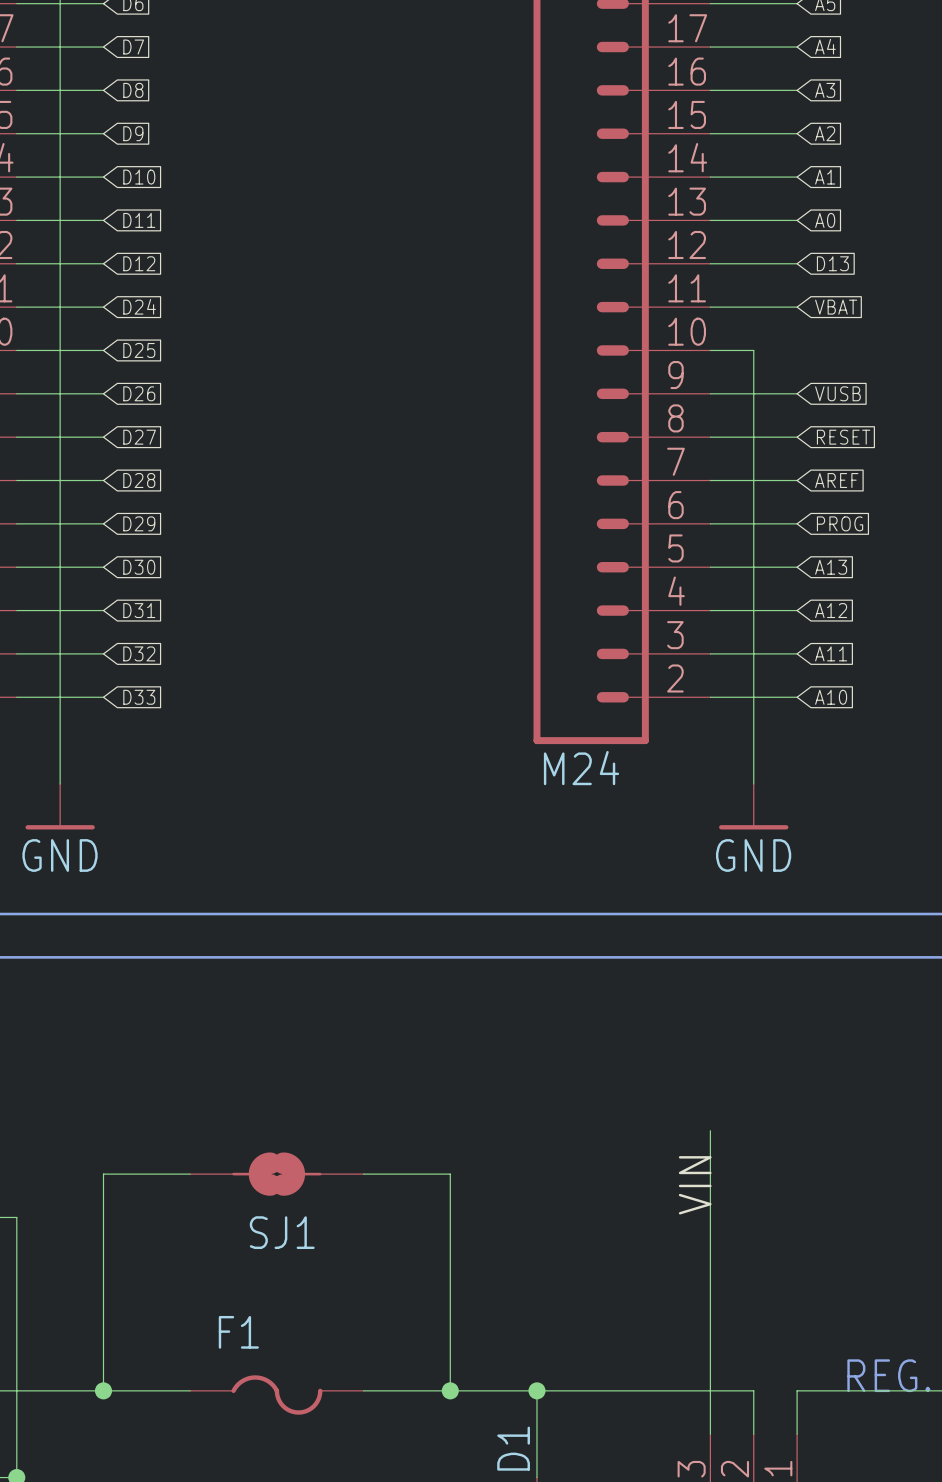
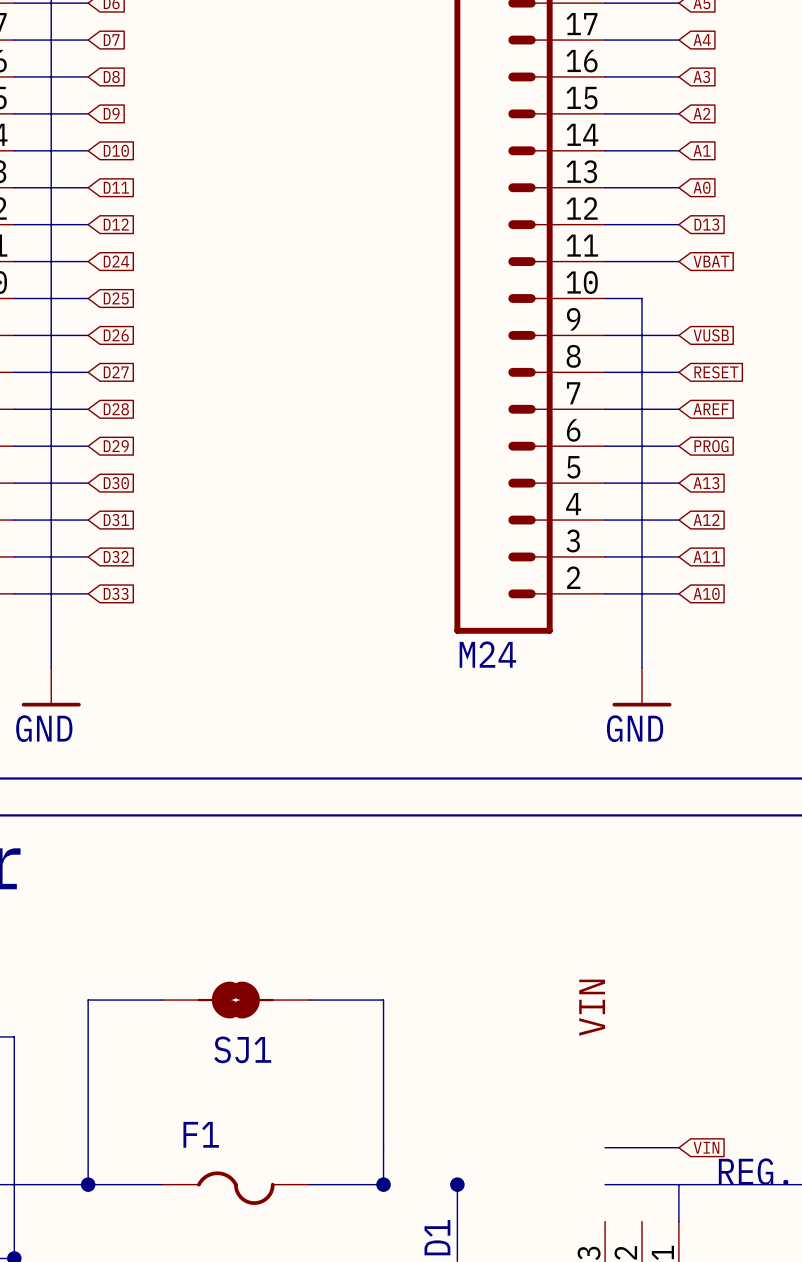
wire: (710, 1130) (710, 1434) -> none
wire: none -> (605, 1147) (678, 1147)
global label: none -> VIN (706, 1147)
wire: (450, 1390) (710, 1390) -> none
wire: (753, 1390) (753, 1434) -> (641, 1184) (678, 1184)

